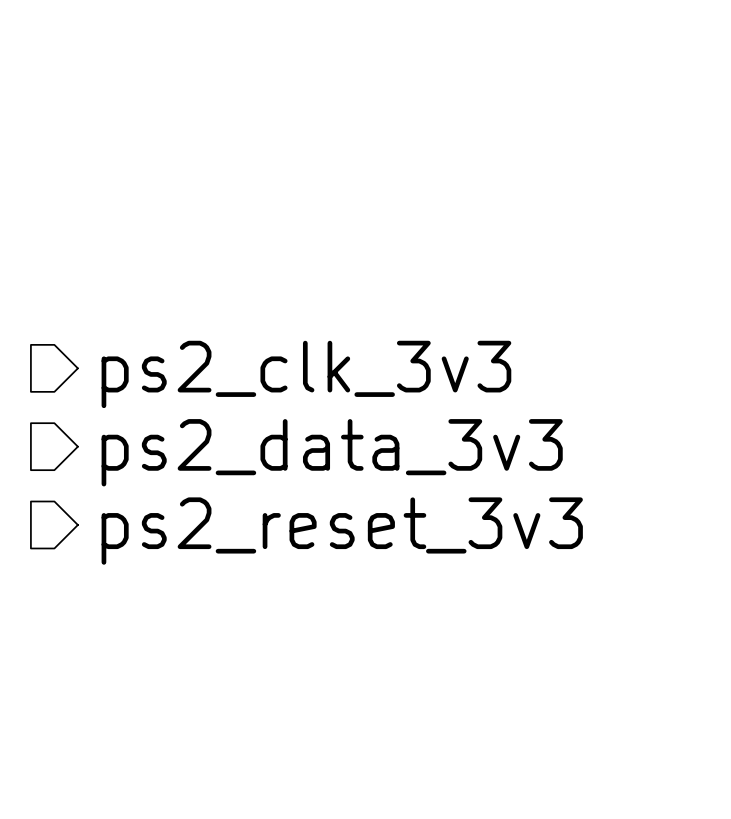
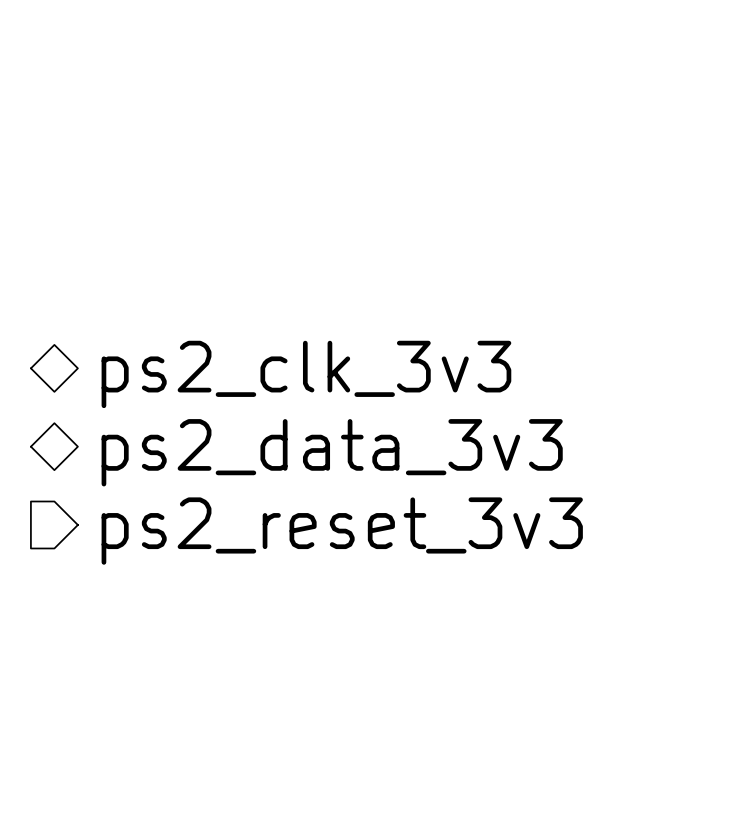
sheet pin shape: input (306, 374) -> bidirectional (306, 374)
sheet pin shape: input (332, 452) -> bidirectional (332, 452)

